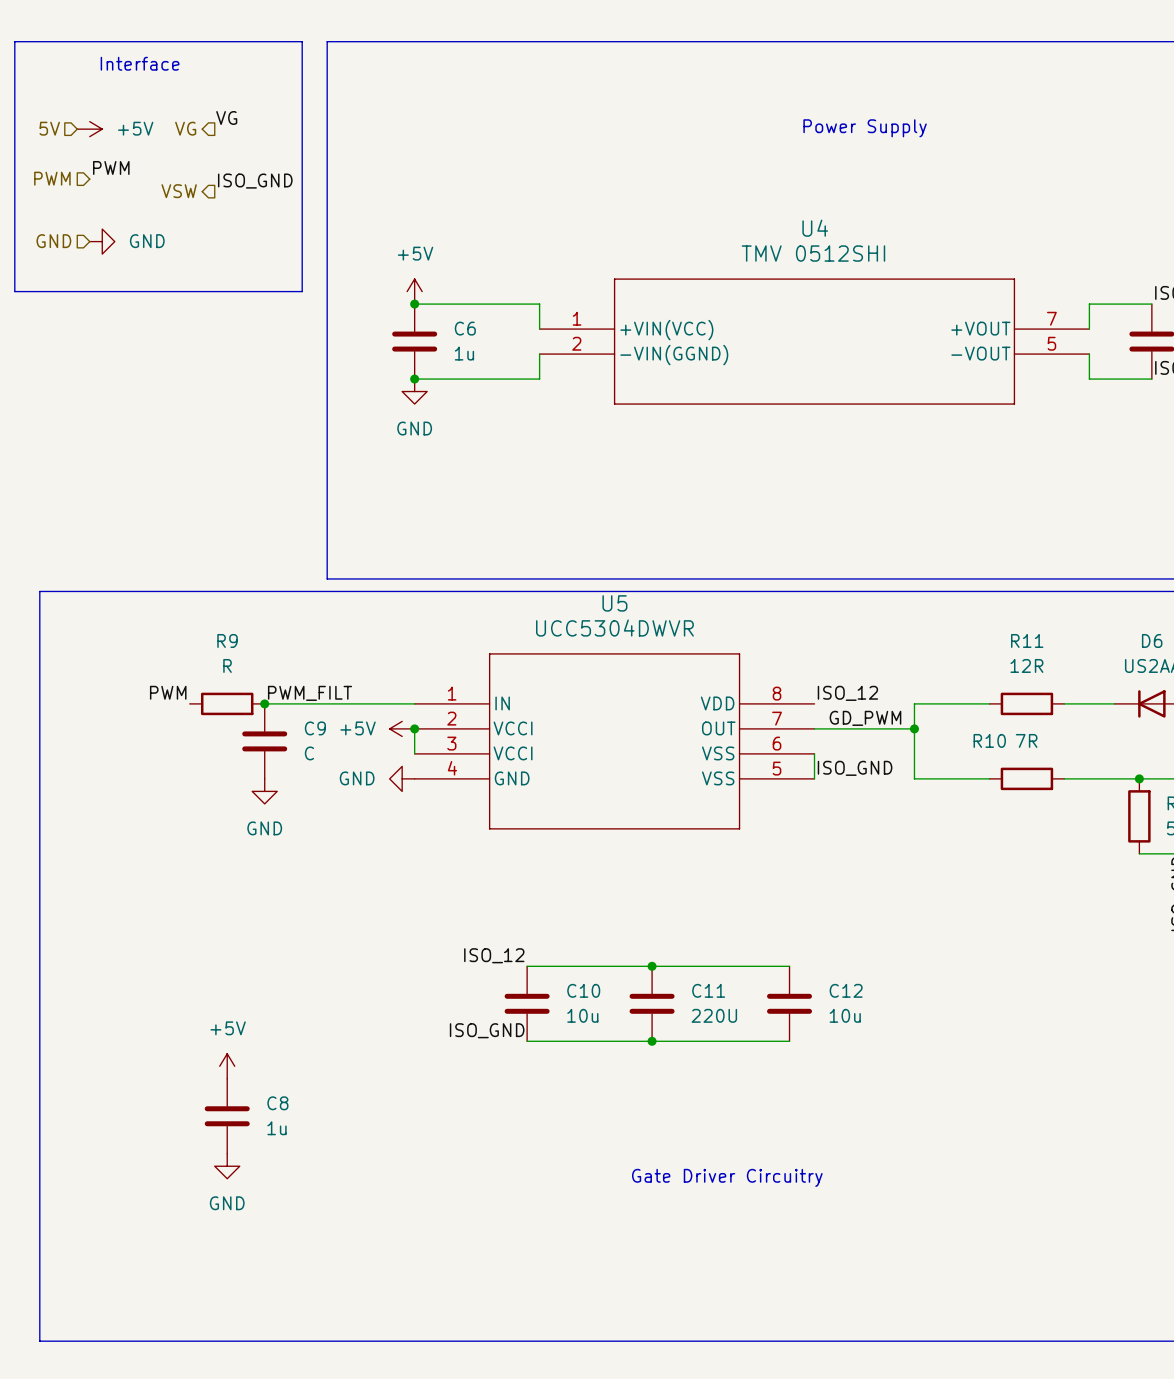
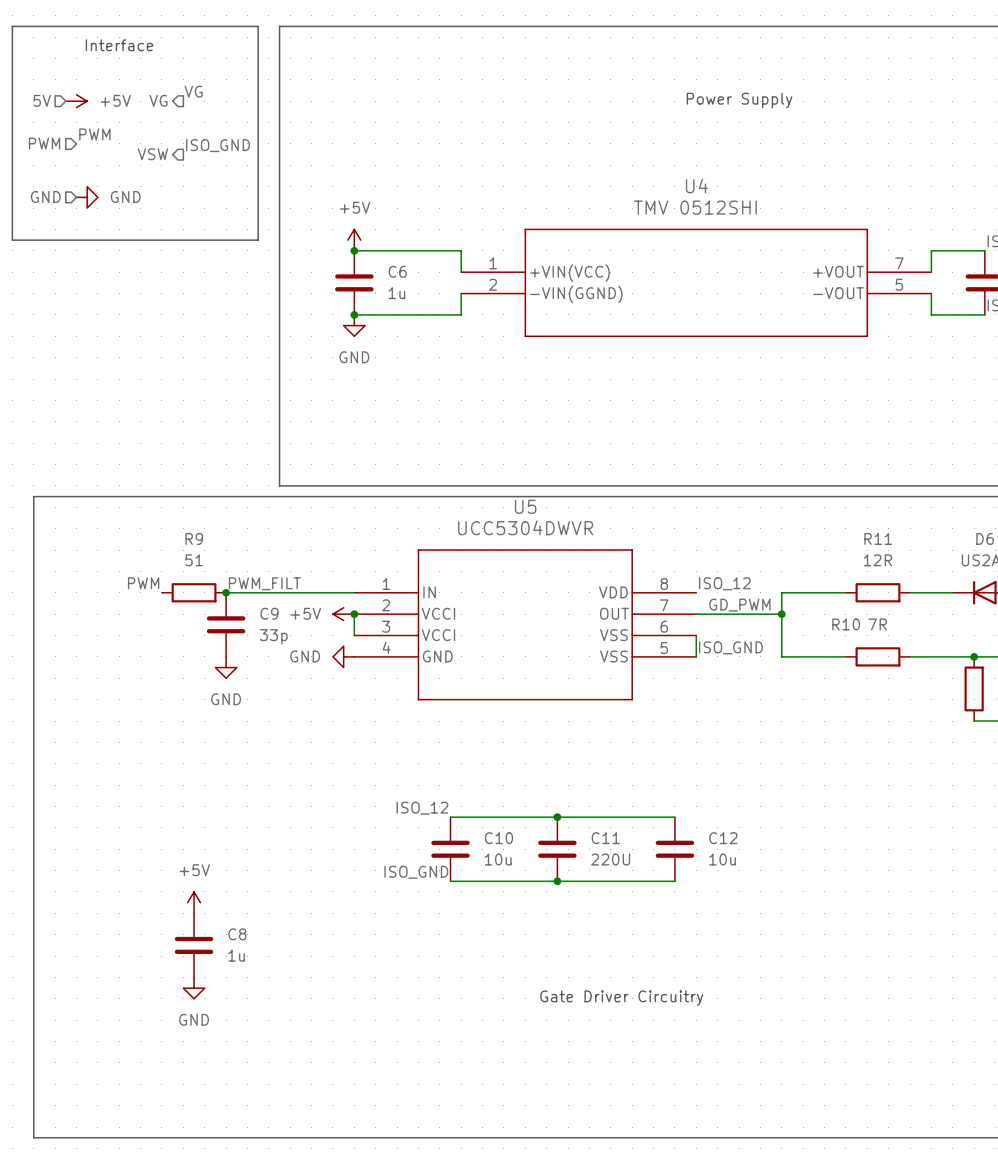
R9 value: R (227, 665) -> 51 (194, 560)
C9 value: C (309, 753) -> 33p (273, 636)

